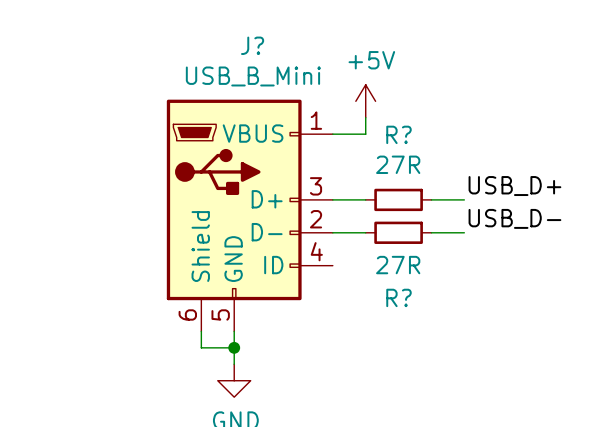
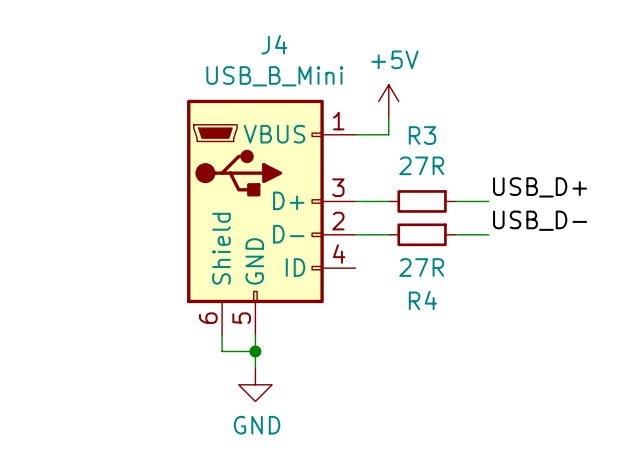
J? name: J? (252, 45) -> J4 (274, 44)
R? name: R? (398, 134) -> R3 (422, 135)
R? name: R? (398, 297) -> R4 (422, 300)

